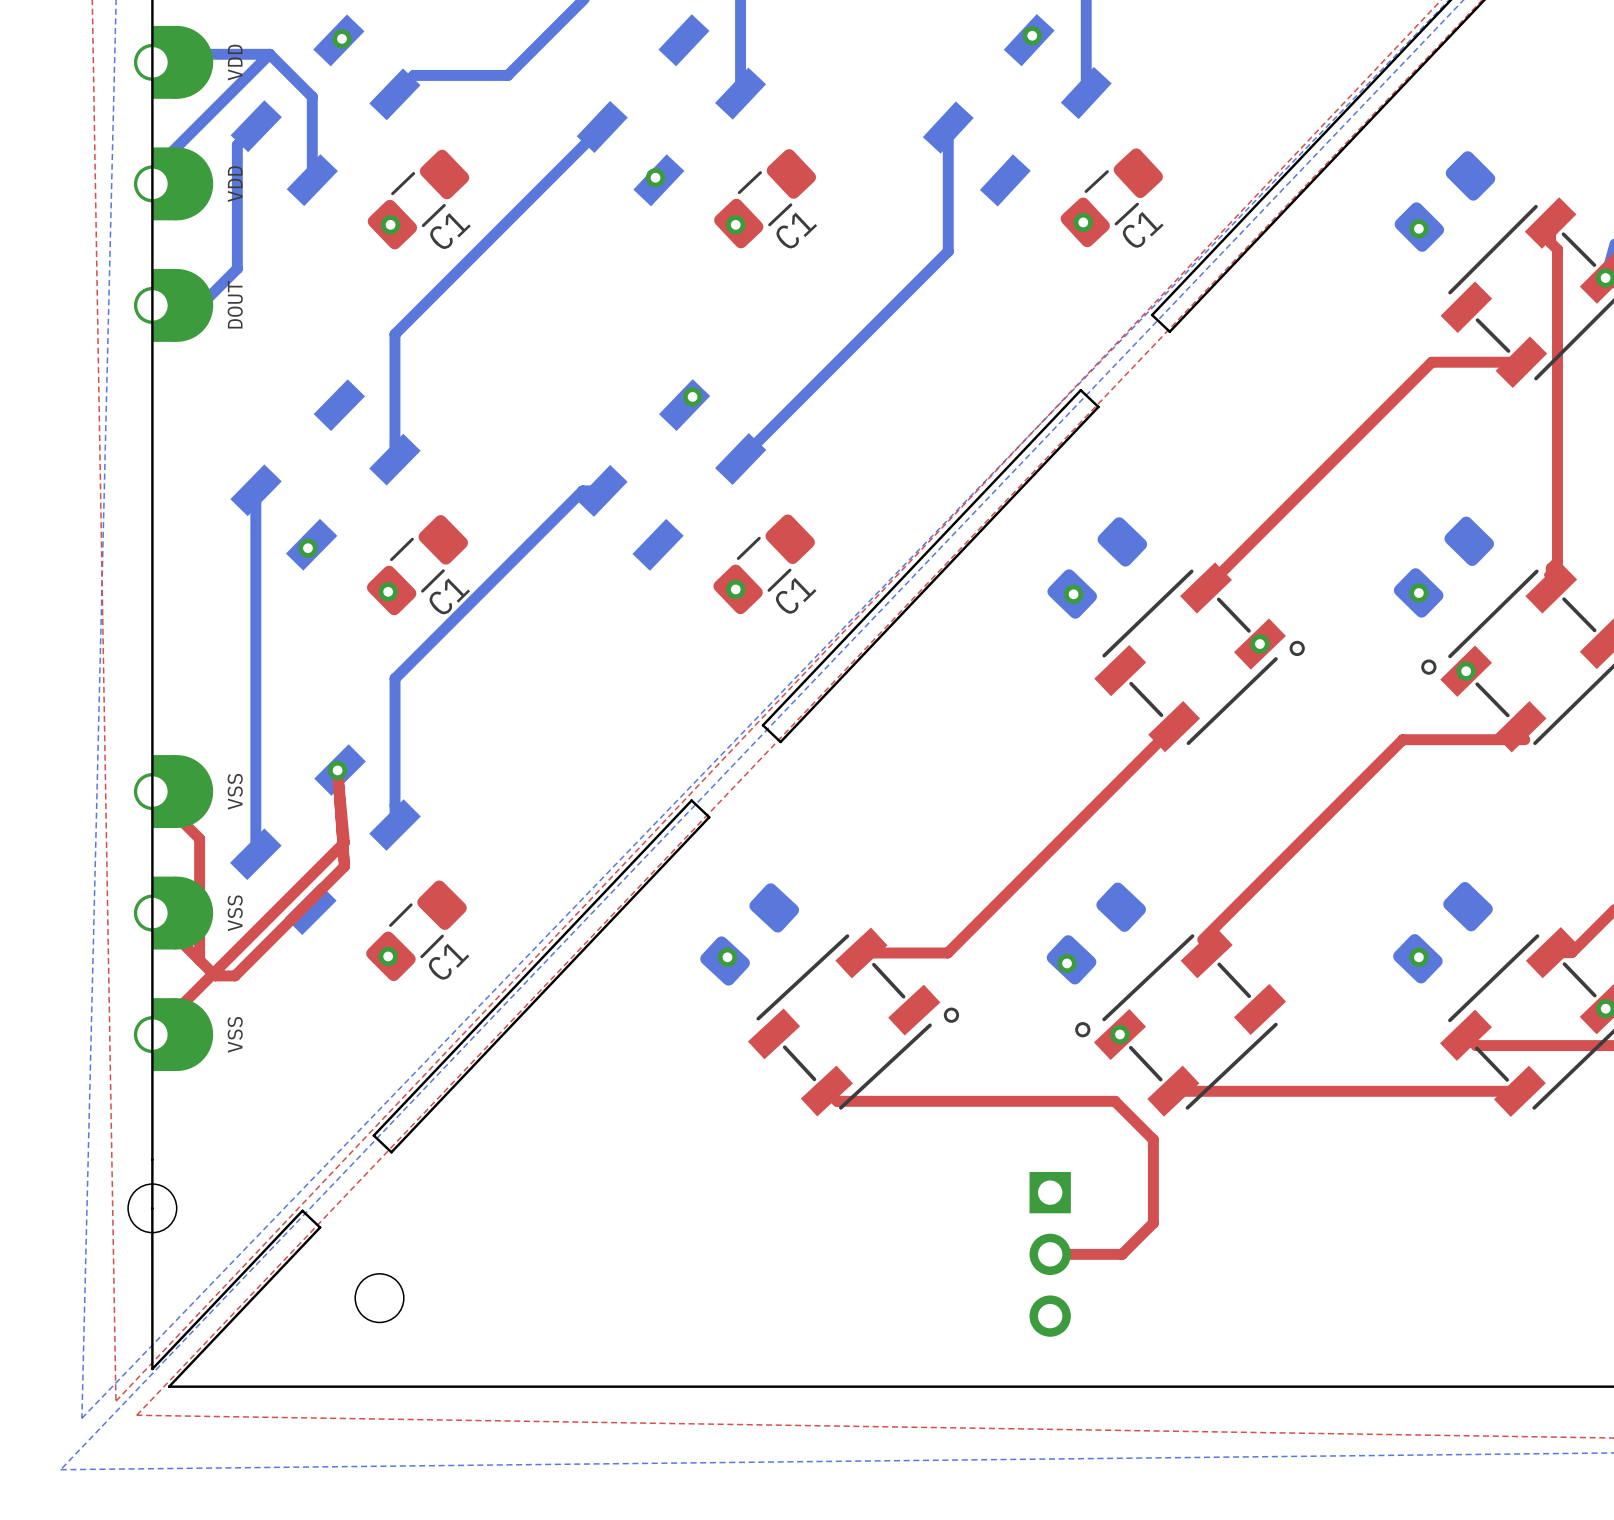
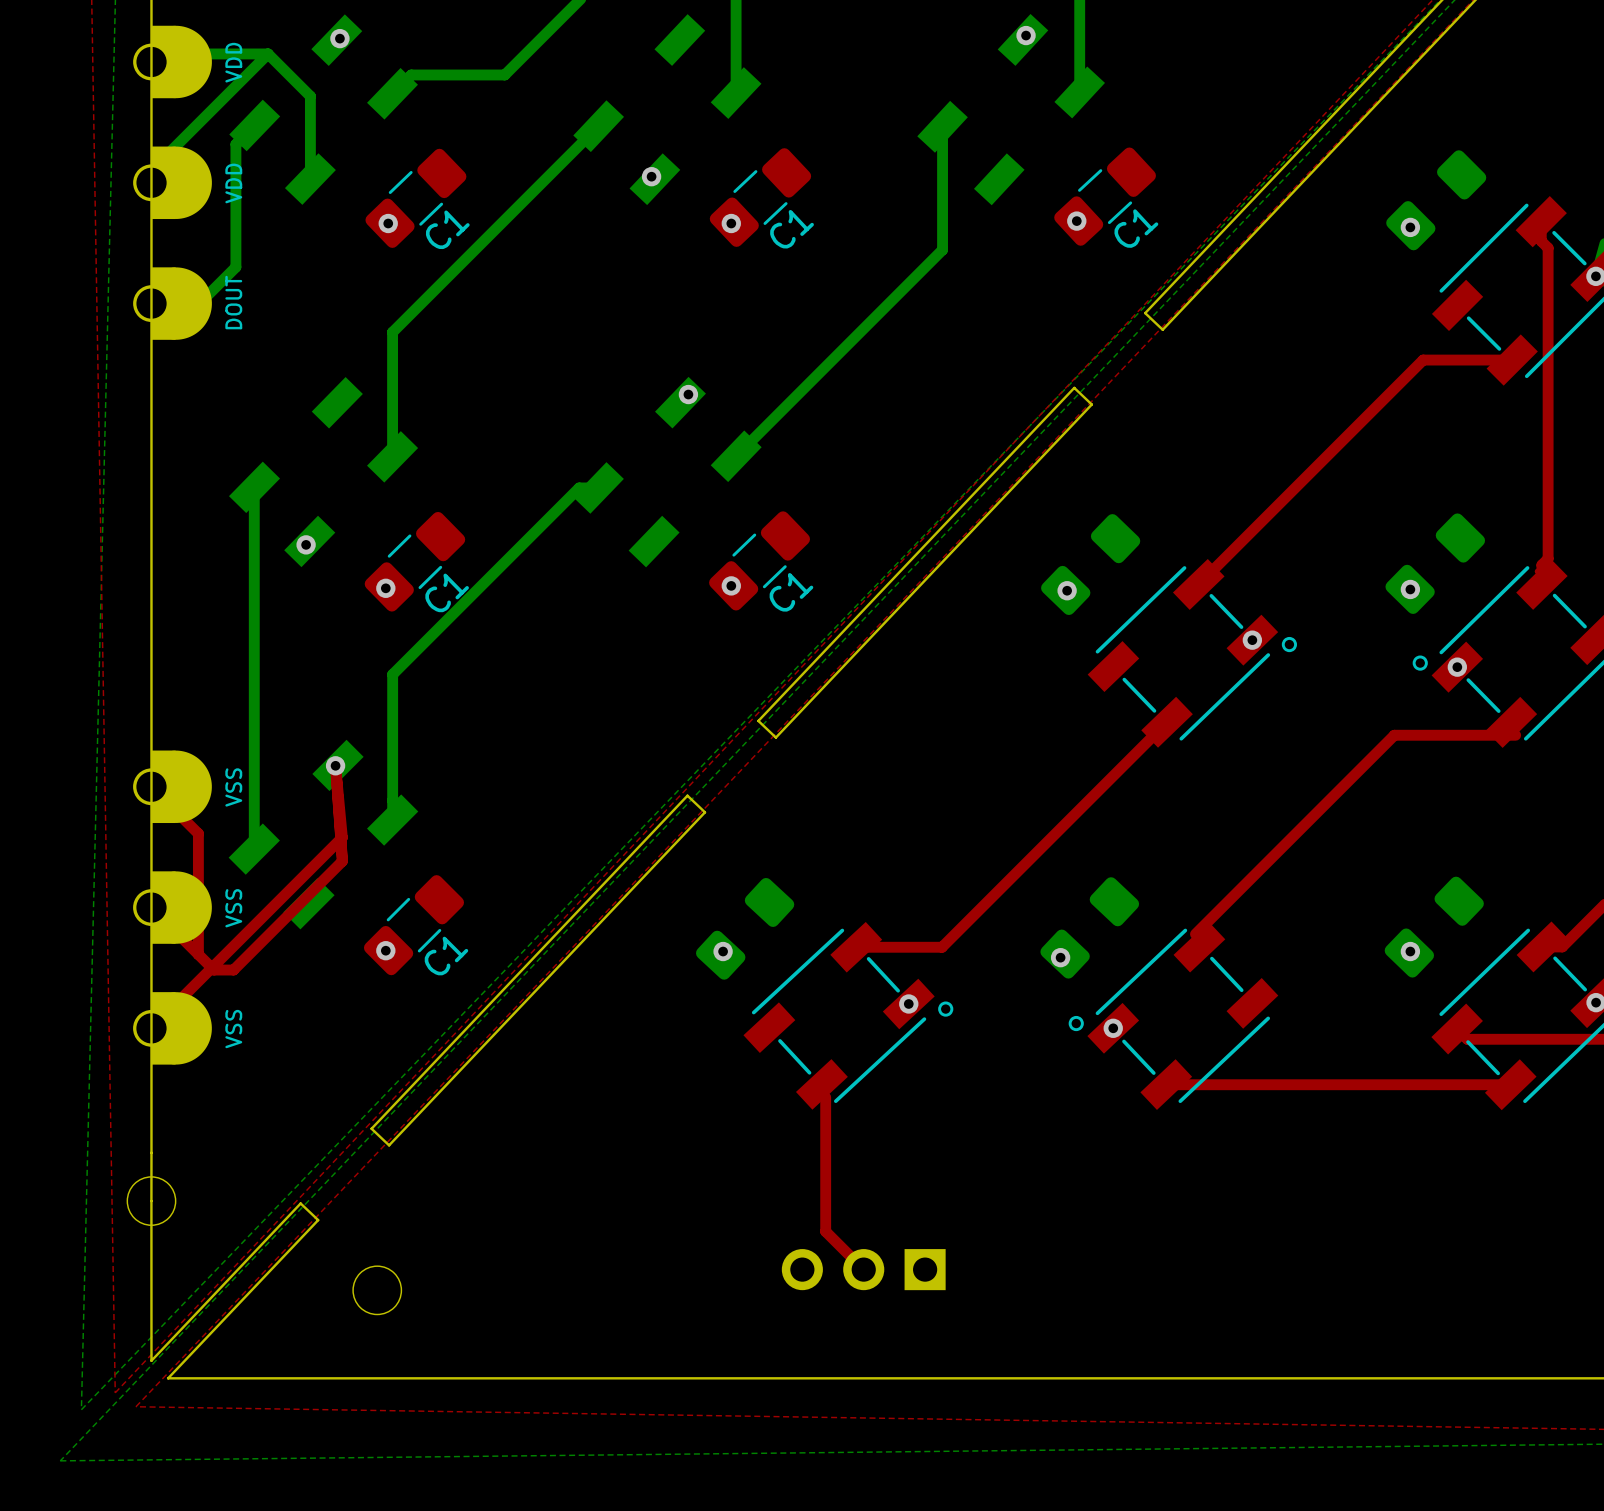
via: none -> (908, 1003)
top track: (826, 1090) (837, 1101) (1114, 1101) (1153, 1139) (1153, 1223) (1122, 1254) (1050, 1254) -> none
top track: none -> (825, 1097) (825, 1231) (863, 1269)
part rotation: 0° (1050, 1254) -> 90° clockwise (863, 1269)
part position: (1050, 1254) -> (863, 1269)

